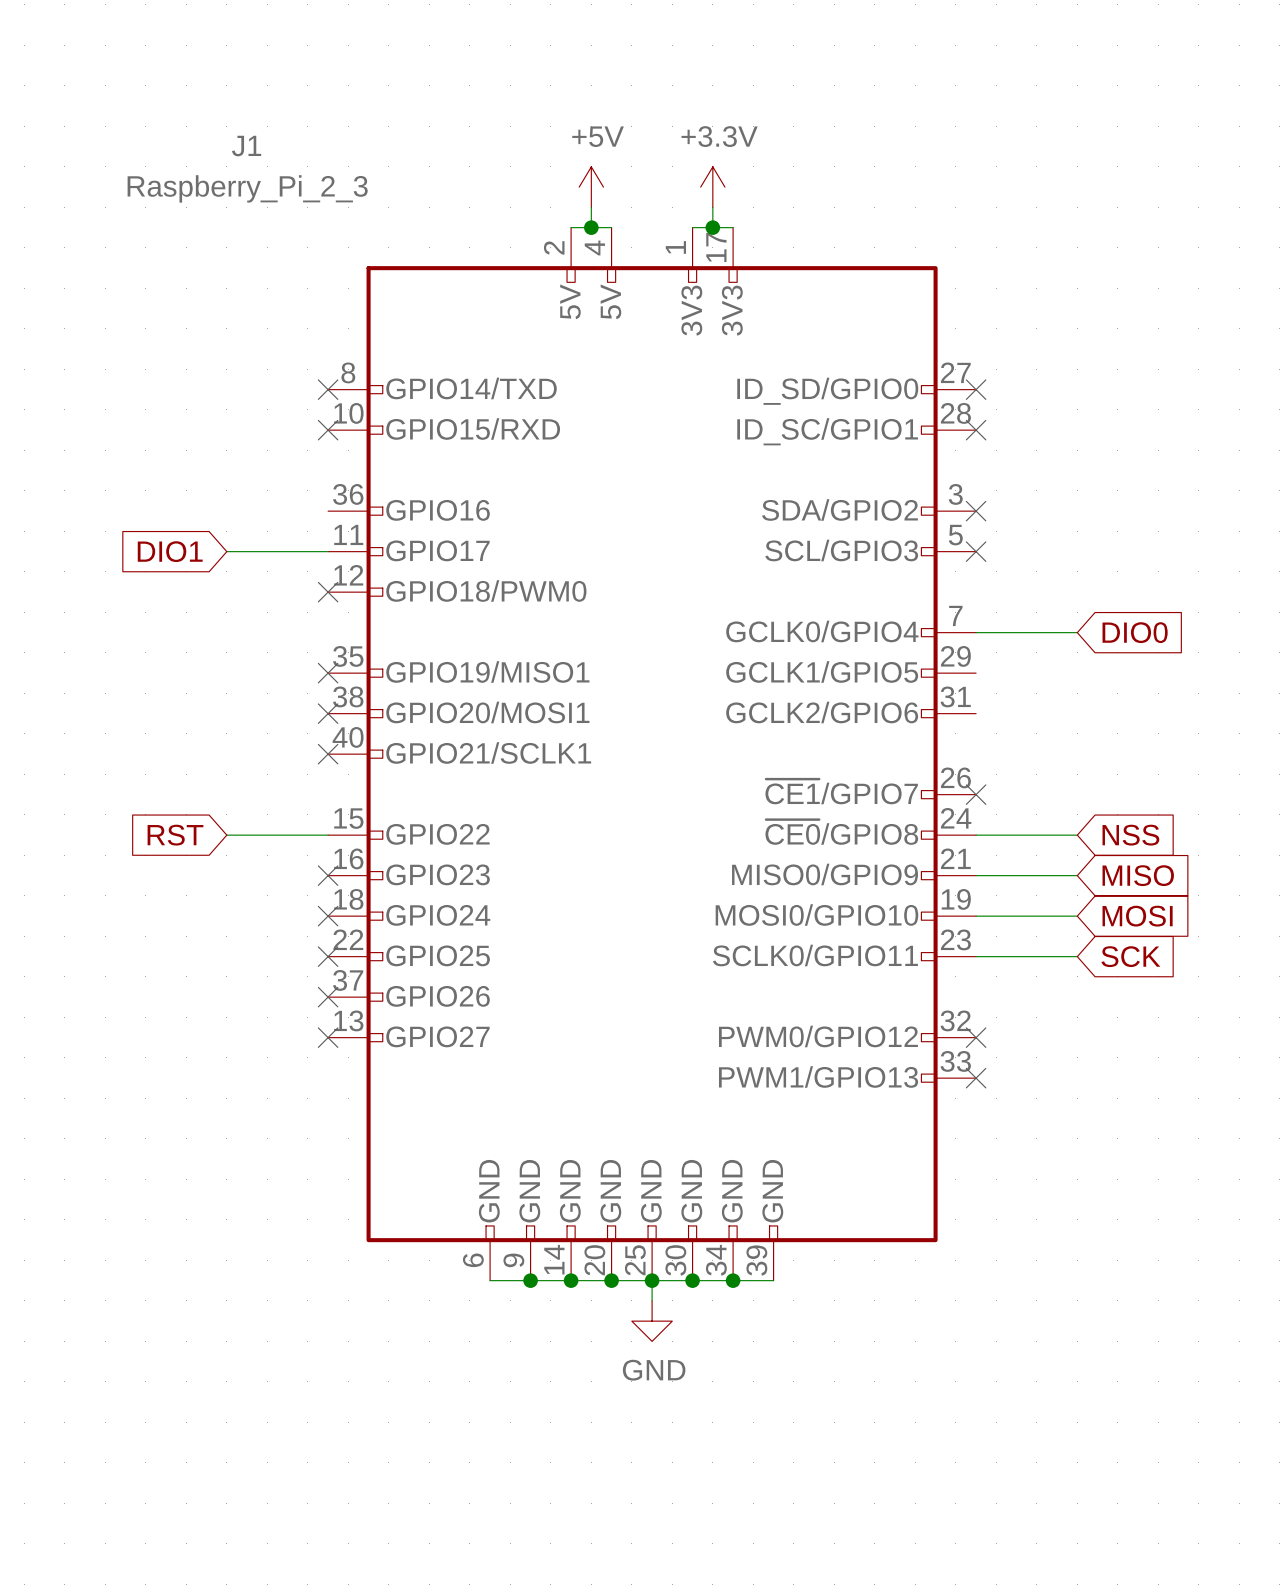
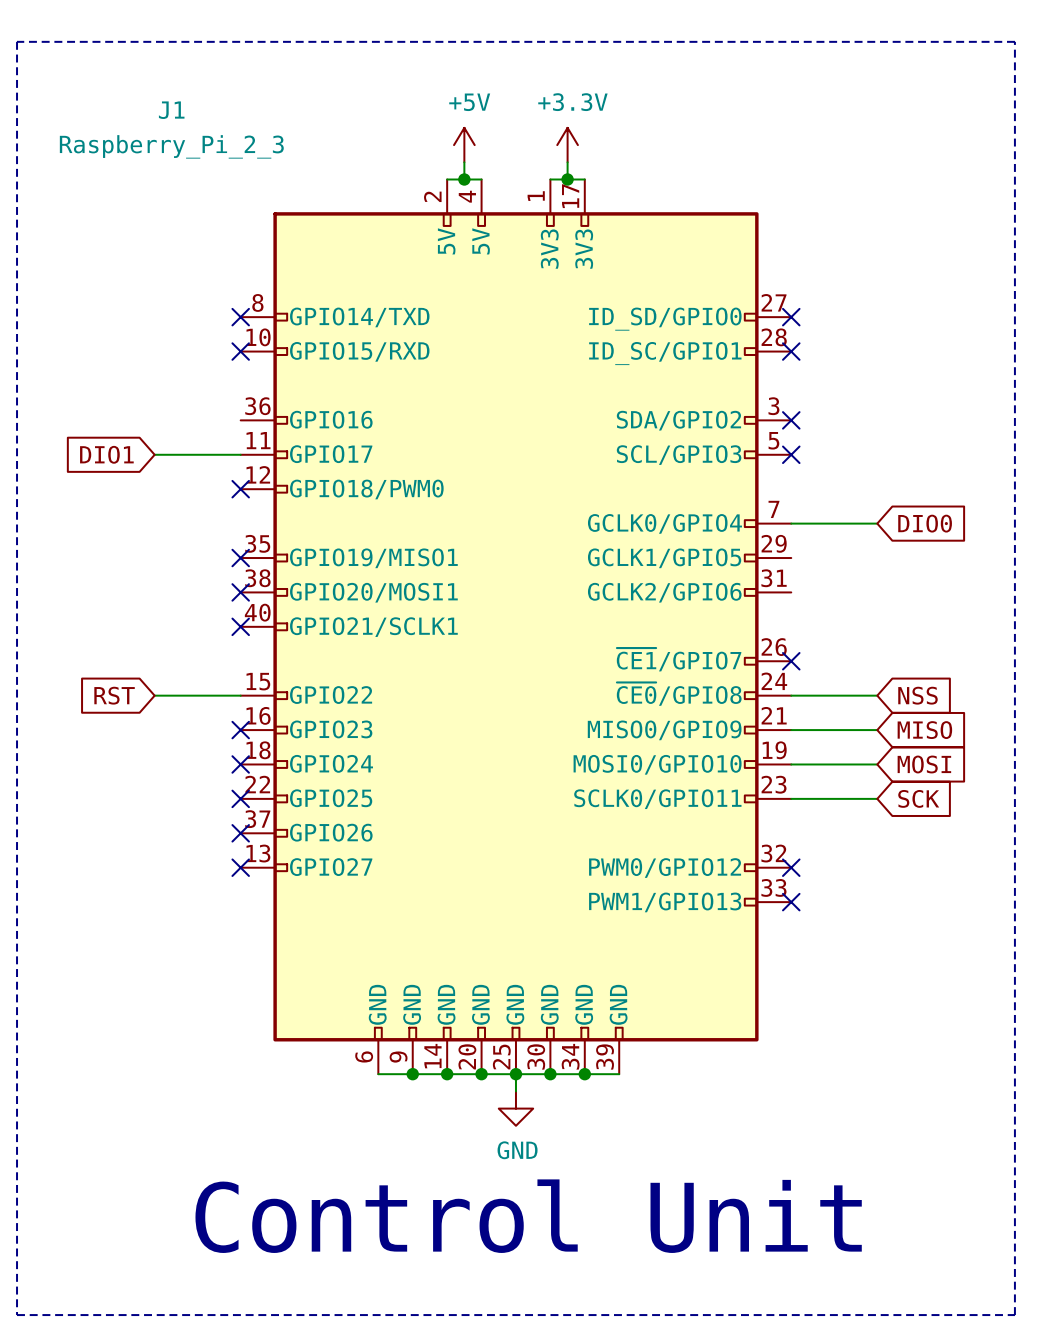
line: none -> (17, 41) (17, 1315) (1014, 1315) (1014, 41) (17, 41)
text: none -> Control Unit (528, 1216)

